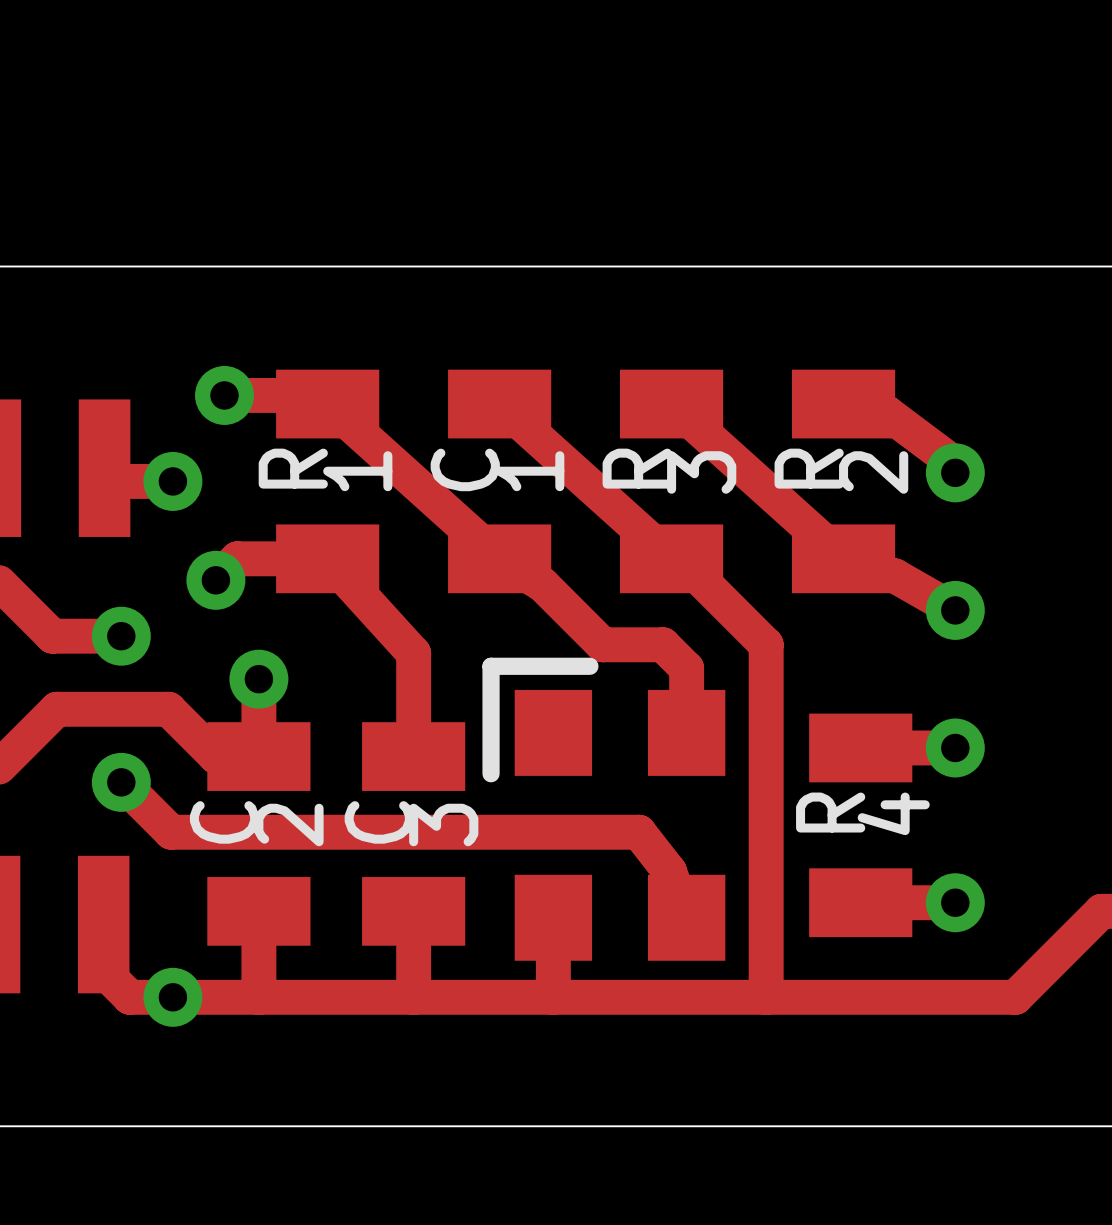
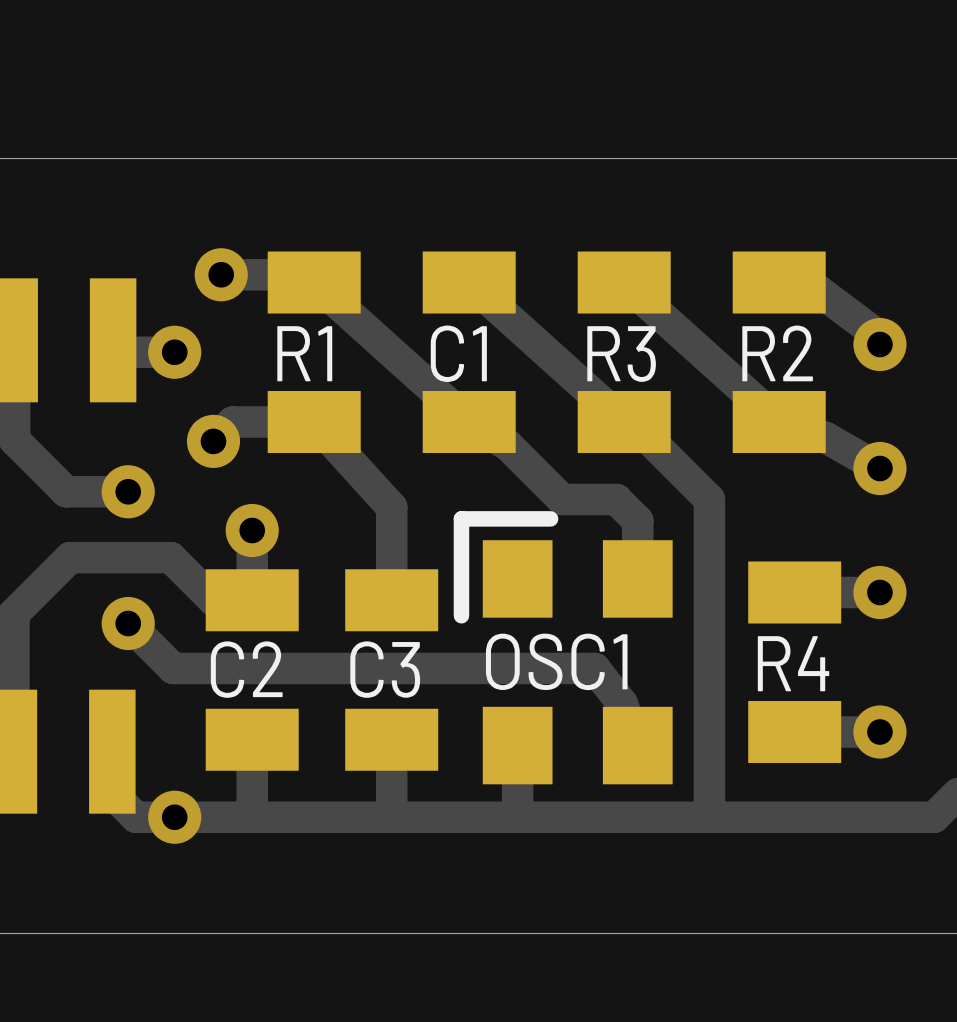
text: R (293, 468) -> none
text: R (637, 468) -> none
text: R (809, 468) -> none
text: C (465, 469) -> none
text: 1 (357, 471) -> none
text: 1 (529, 471) -> none
text: 3 (701, 472) -> none
text: 2 (873, 472) -> none
R1 name: none -> R1 (304, 353)
C1 name: none -> C1 (458, 353)
R3 name: none -> R3 (621, 354)
R2 name: none -> R2 (777, 353)
text: R (830, 812) -> none
text: 4 (893, 813) -> none
text: C (224, 822) -> none
text: C (379, 822) -> none
text: 2 (288, 825) -> none
text: 3 (443, 825) -> OSC1 (556, 661)
R4 name: none -> R4 (793, 663)
C2 name: none -> C2 (246, 669)
C3 name: none -> C3 (385, 669)

